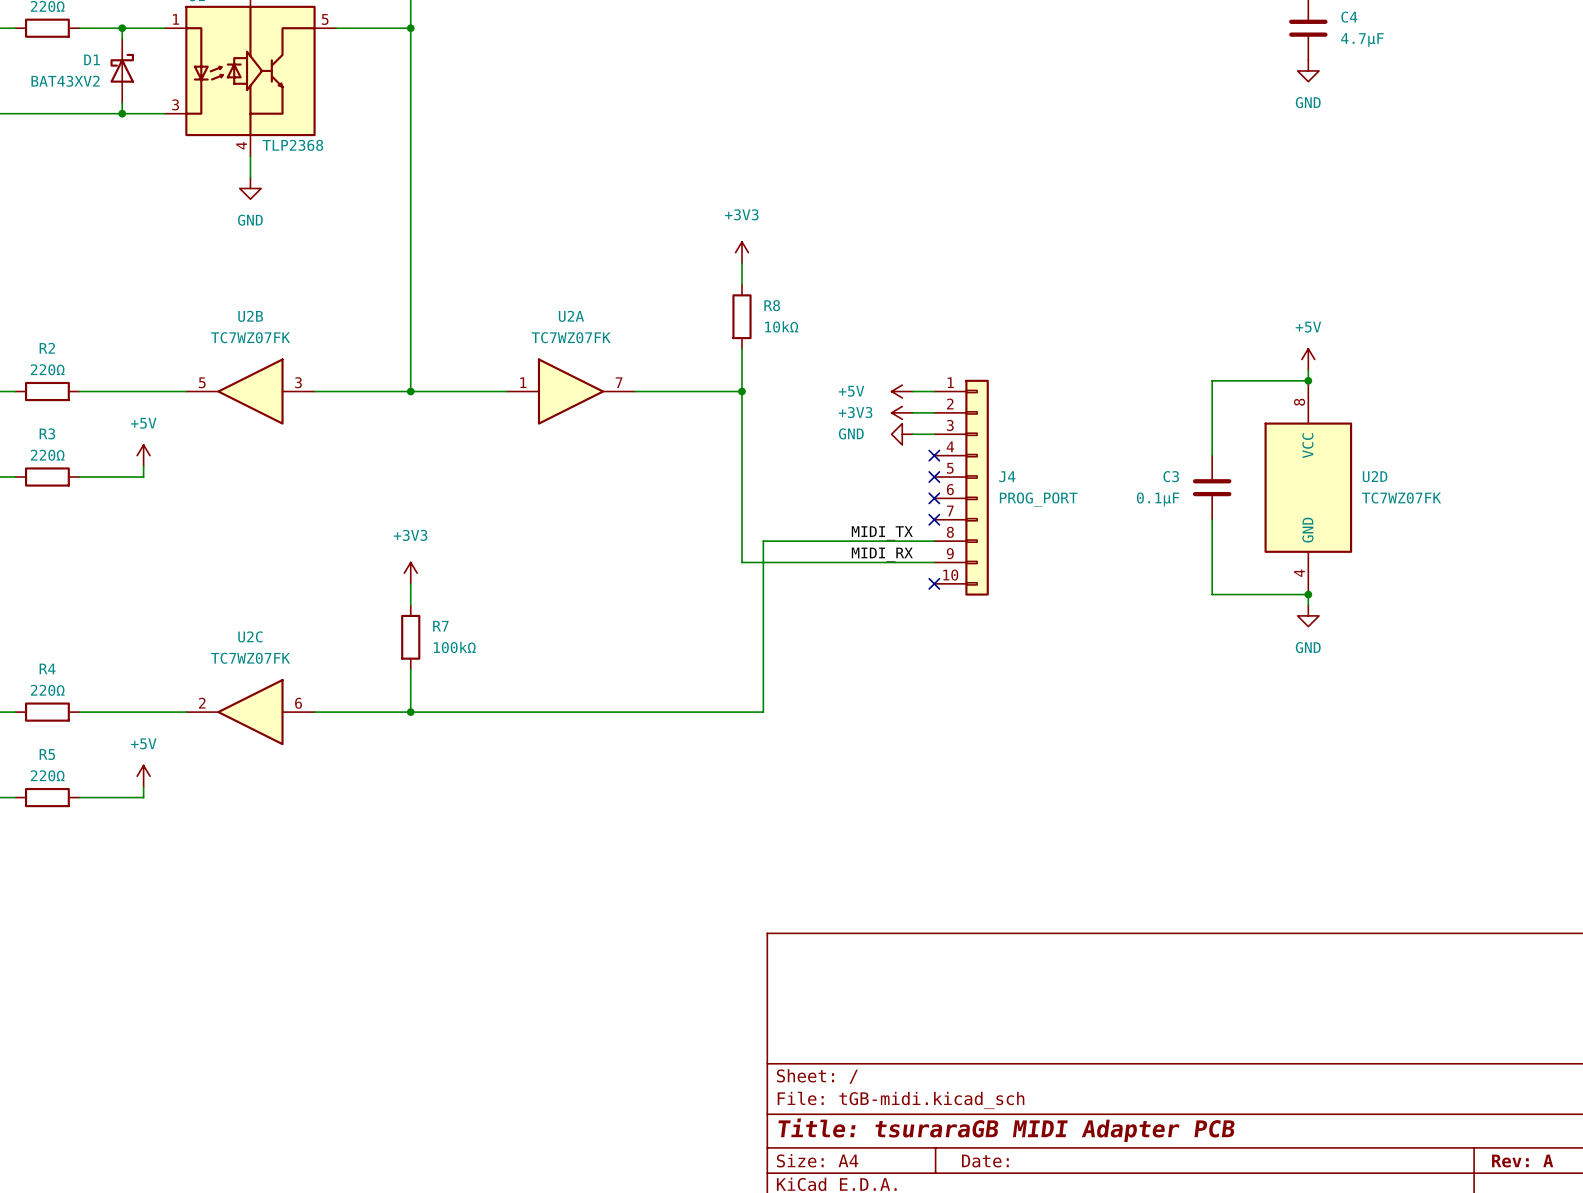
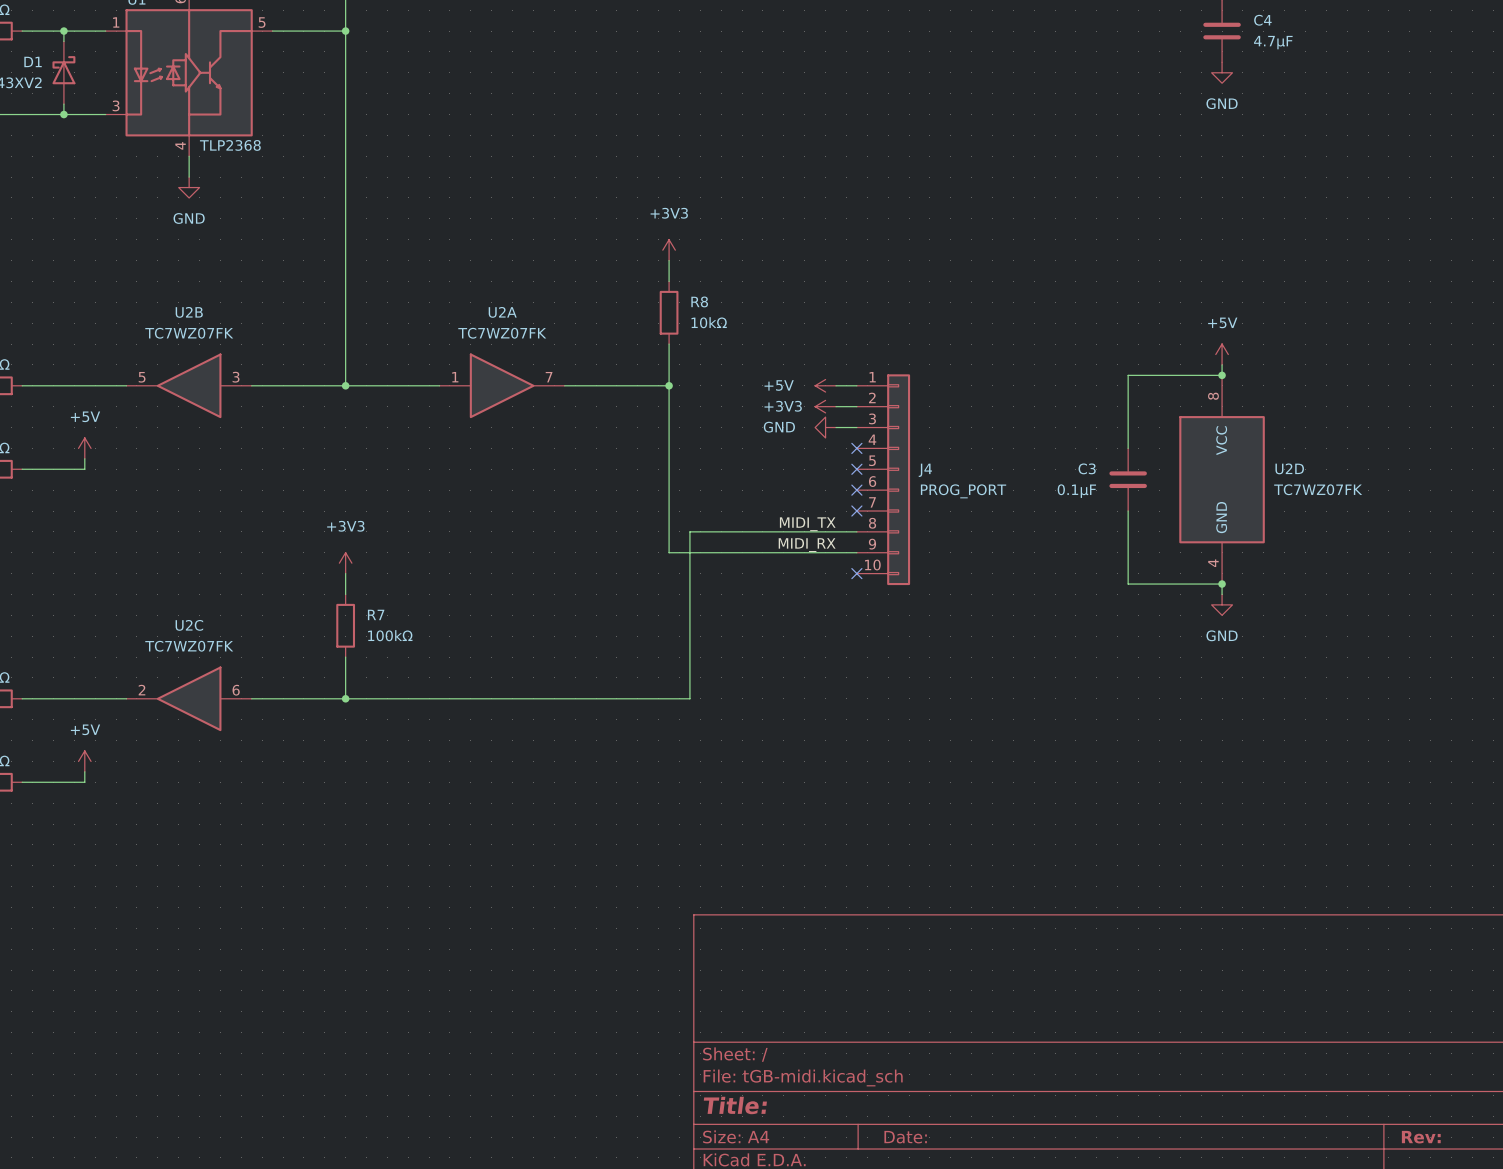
title block: Title: tsuraraGB MIDI Adapter PCB (1006, 1130) -> Title: (735, 1105)
title block: Rev: A (1522, 1161) -> Rev: (1421, 1137)

